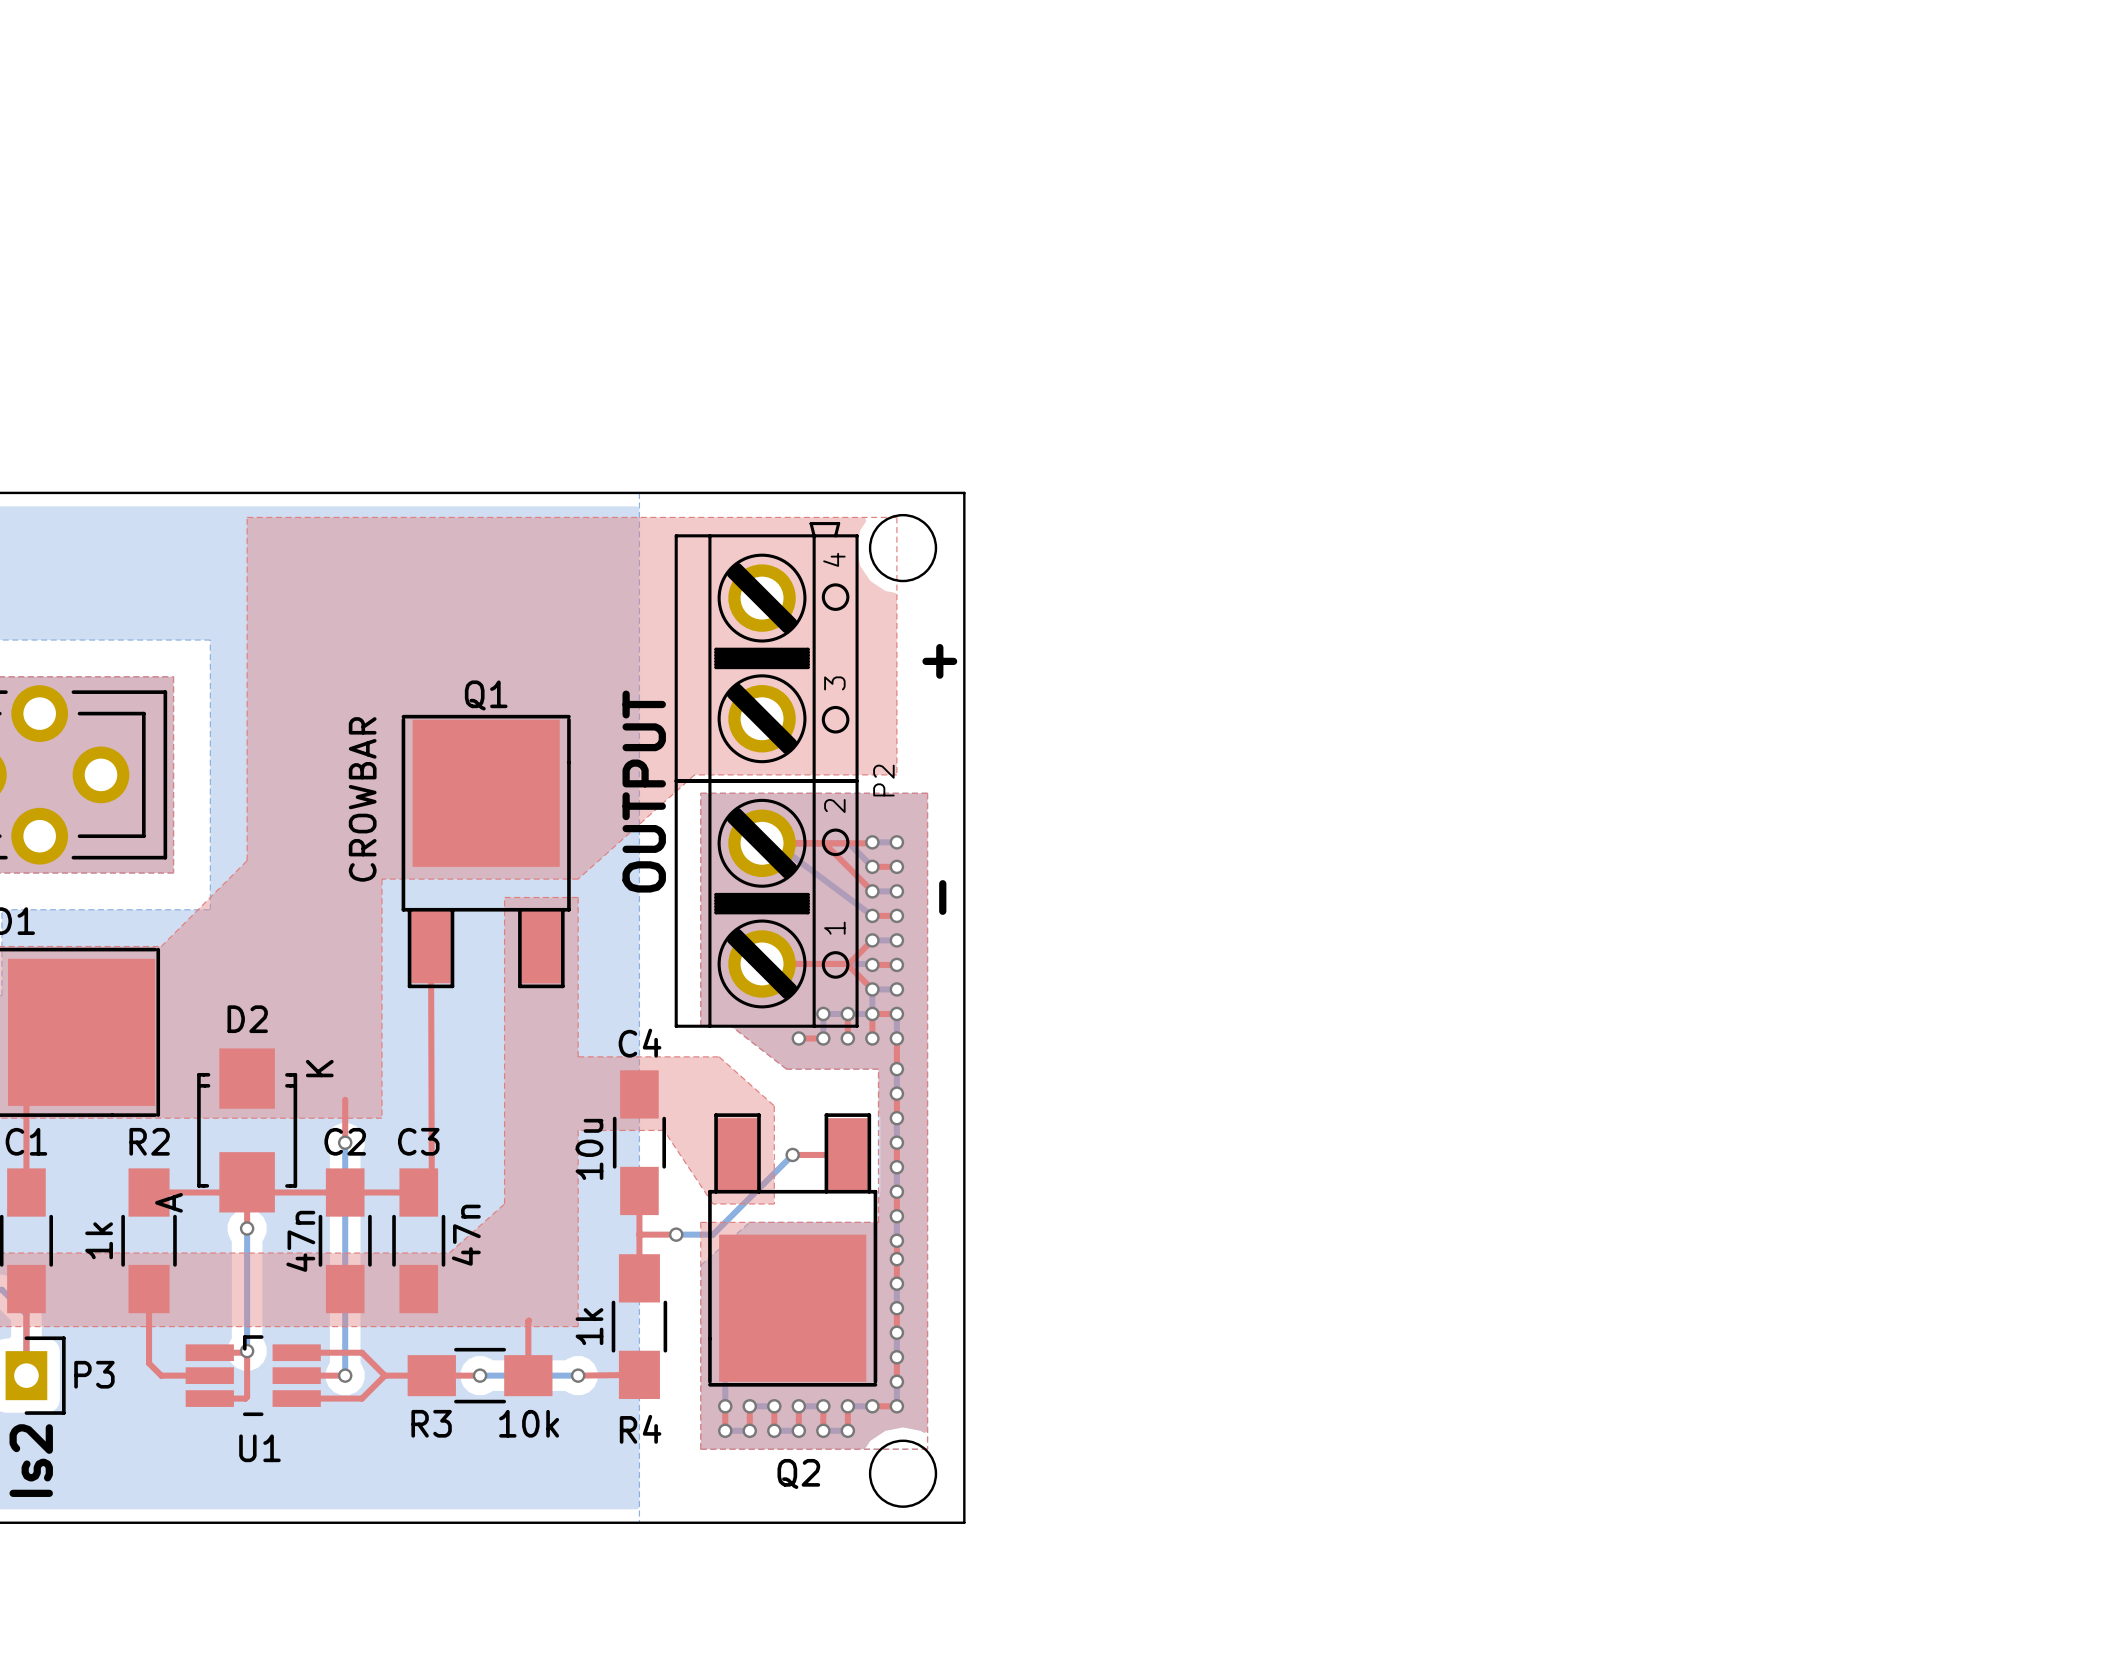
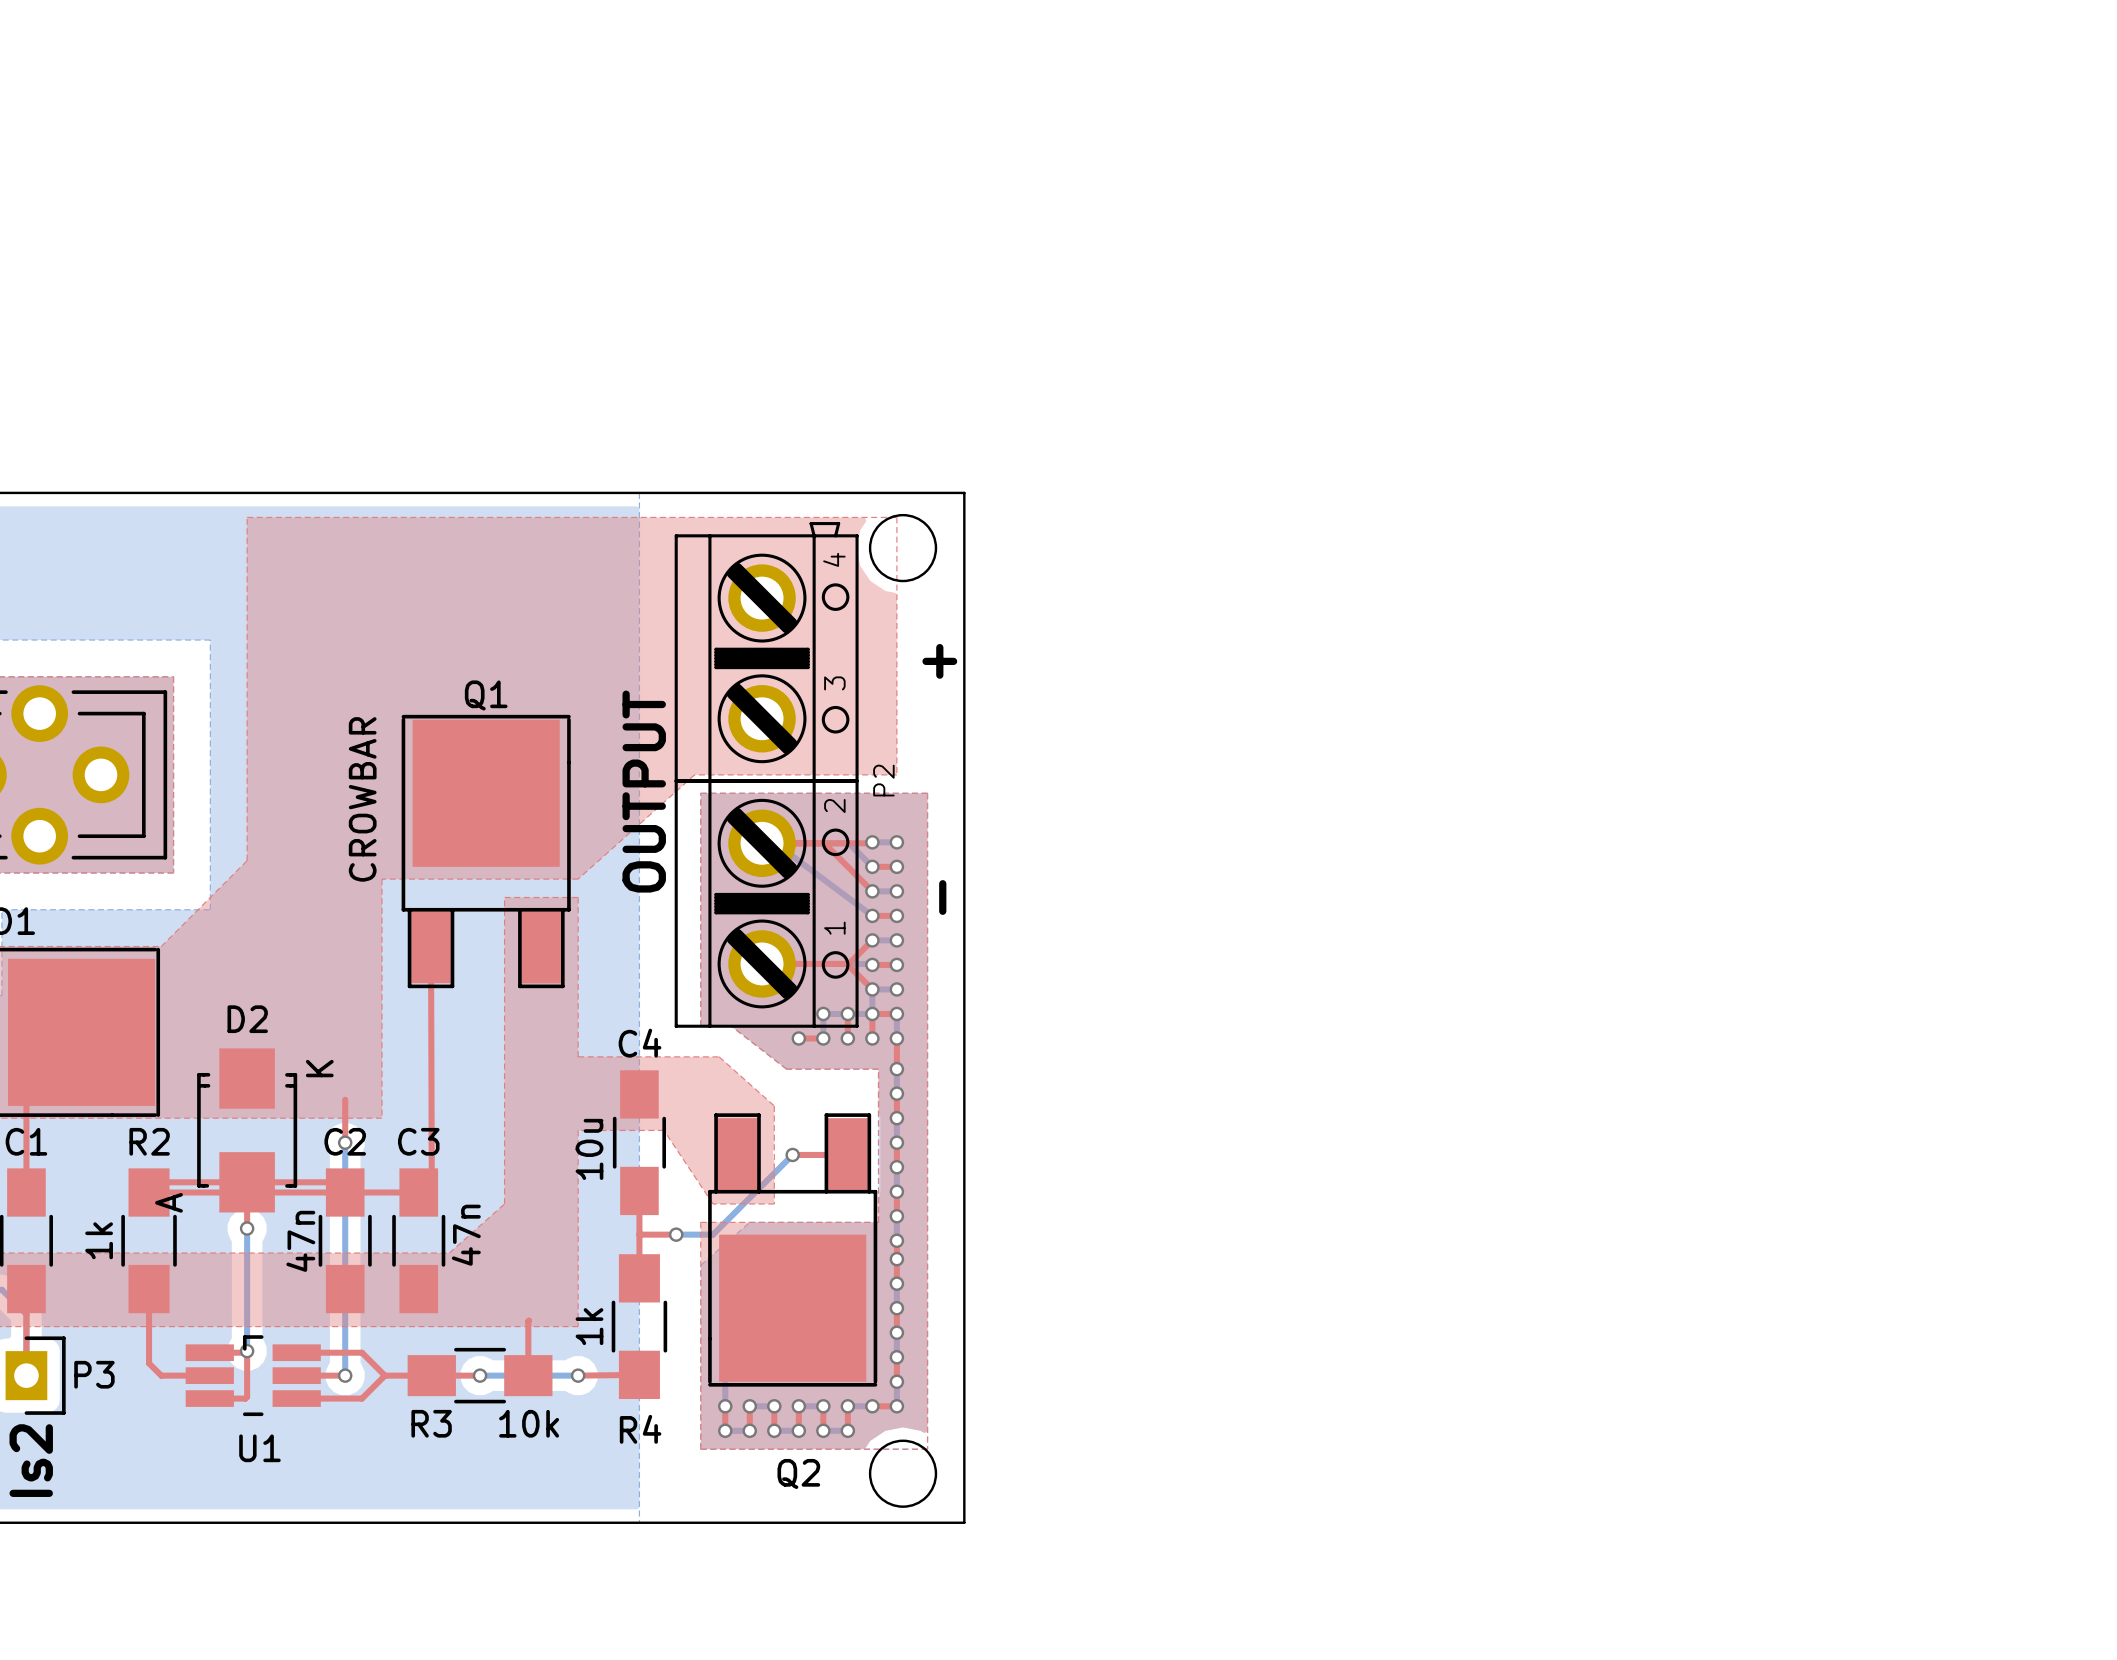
top track: none -> (149, 1192) (159, 1182) (334, 1182) (345, 1192)

